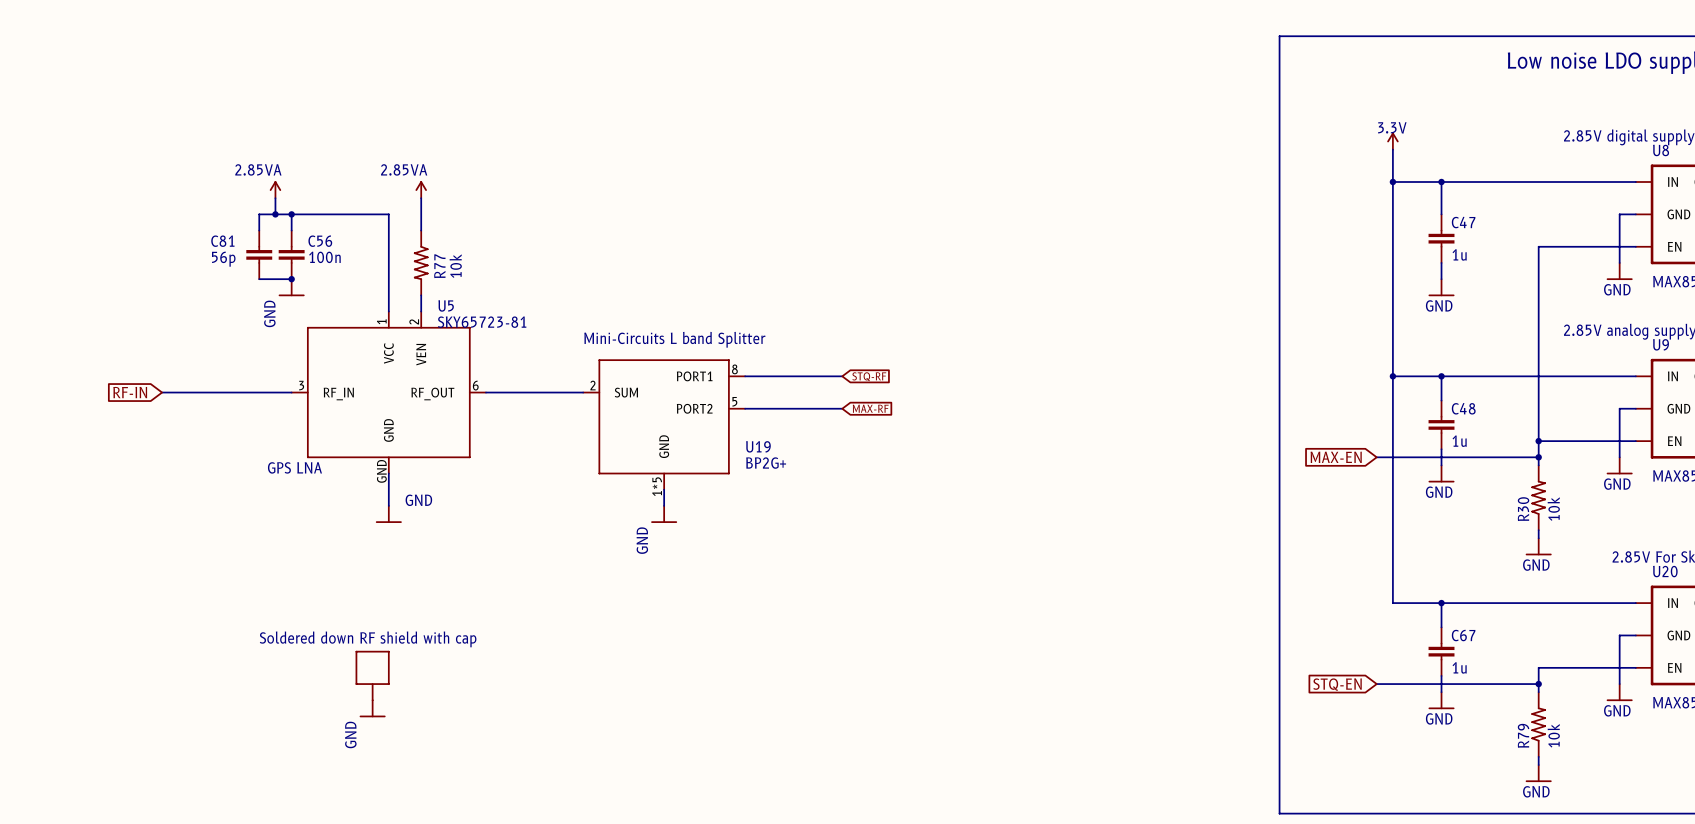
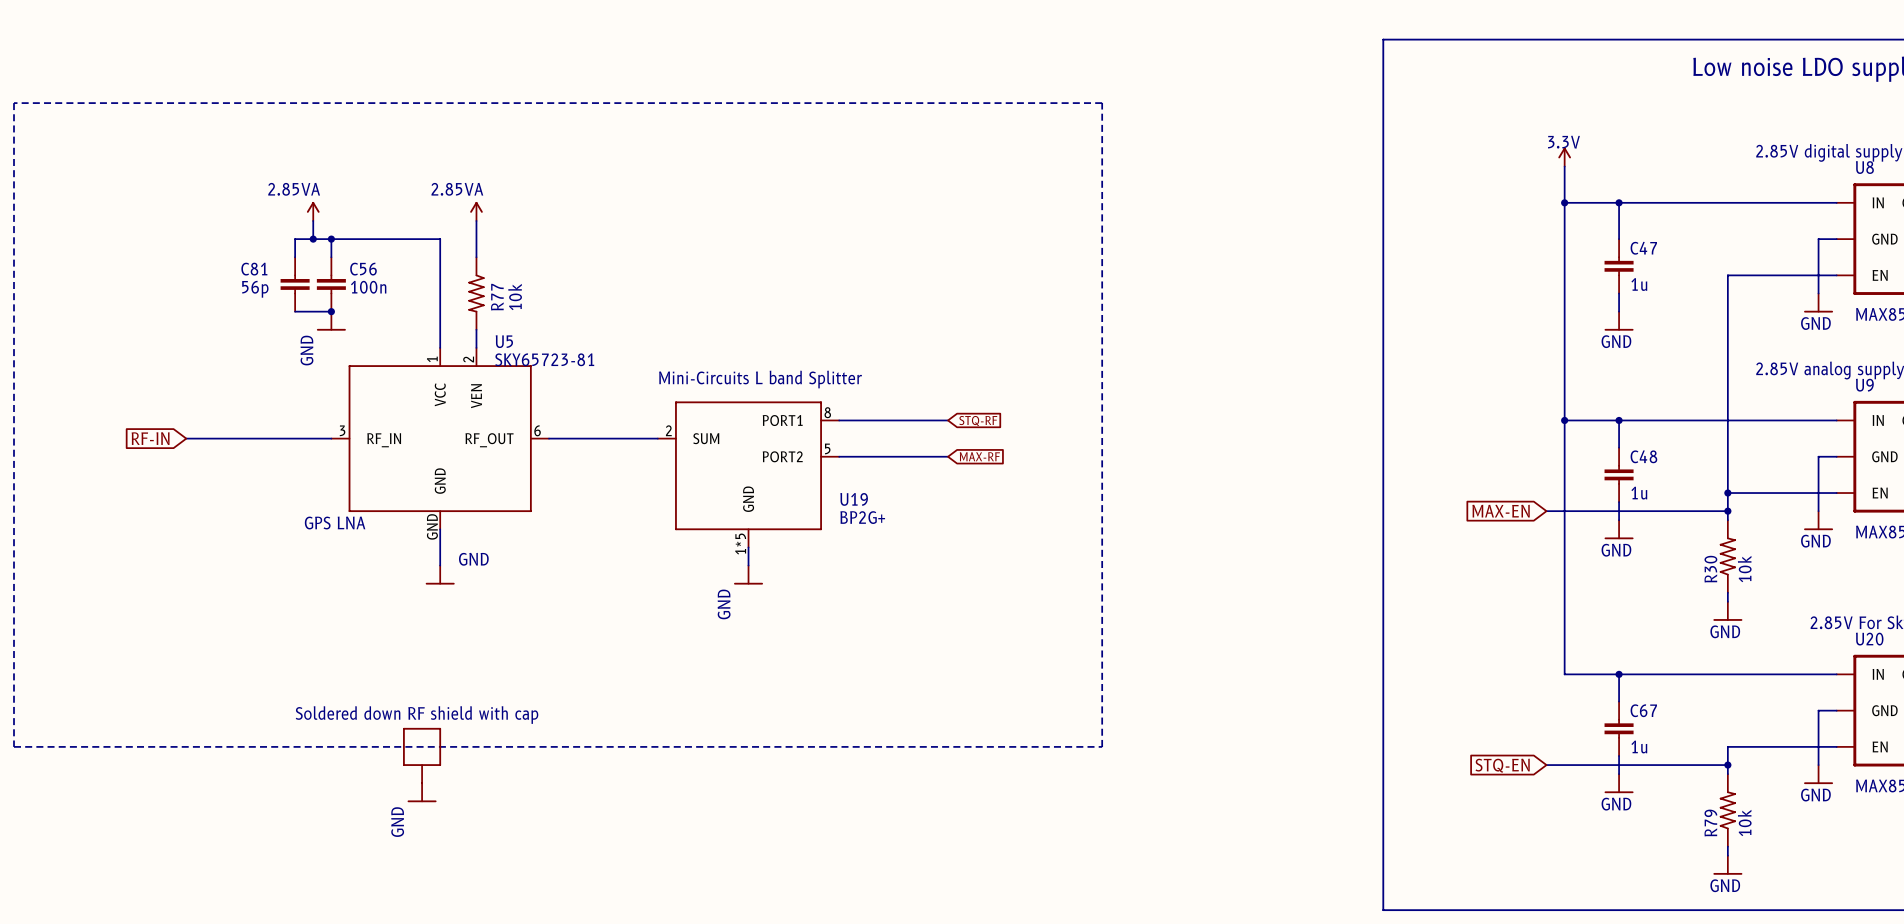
line: (1279, 36) (1279, 813) -> (1437, 39) (1383, 39) (1383, 910) (1437, 910)
line: none -> (14, 103) (14, 746) (1102, 746) (1102, 103) (14, 103)

